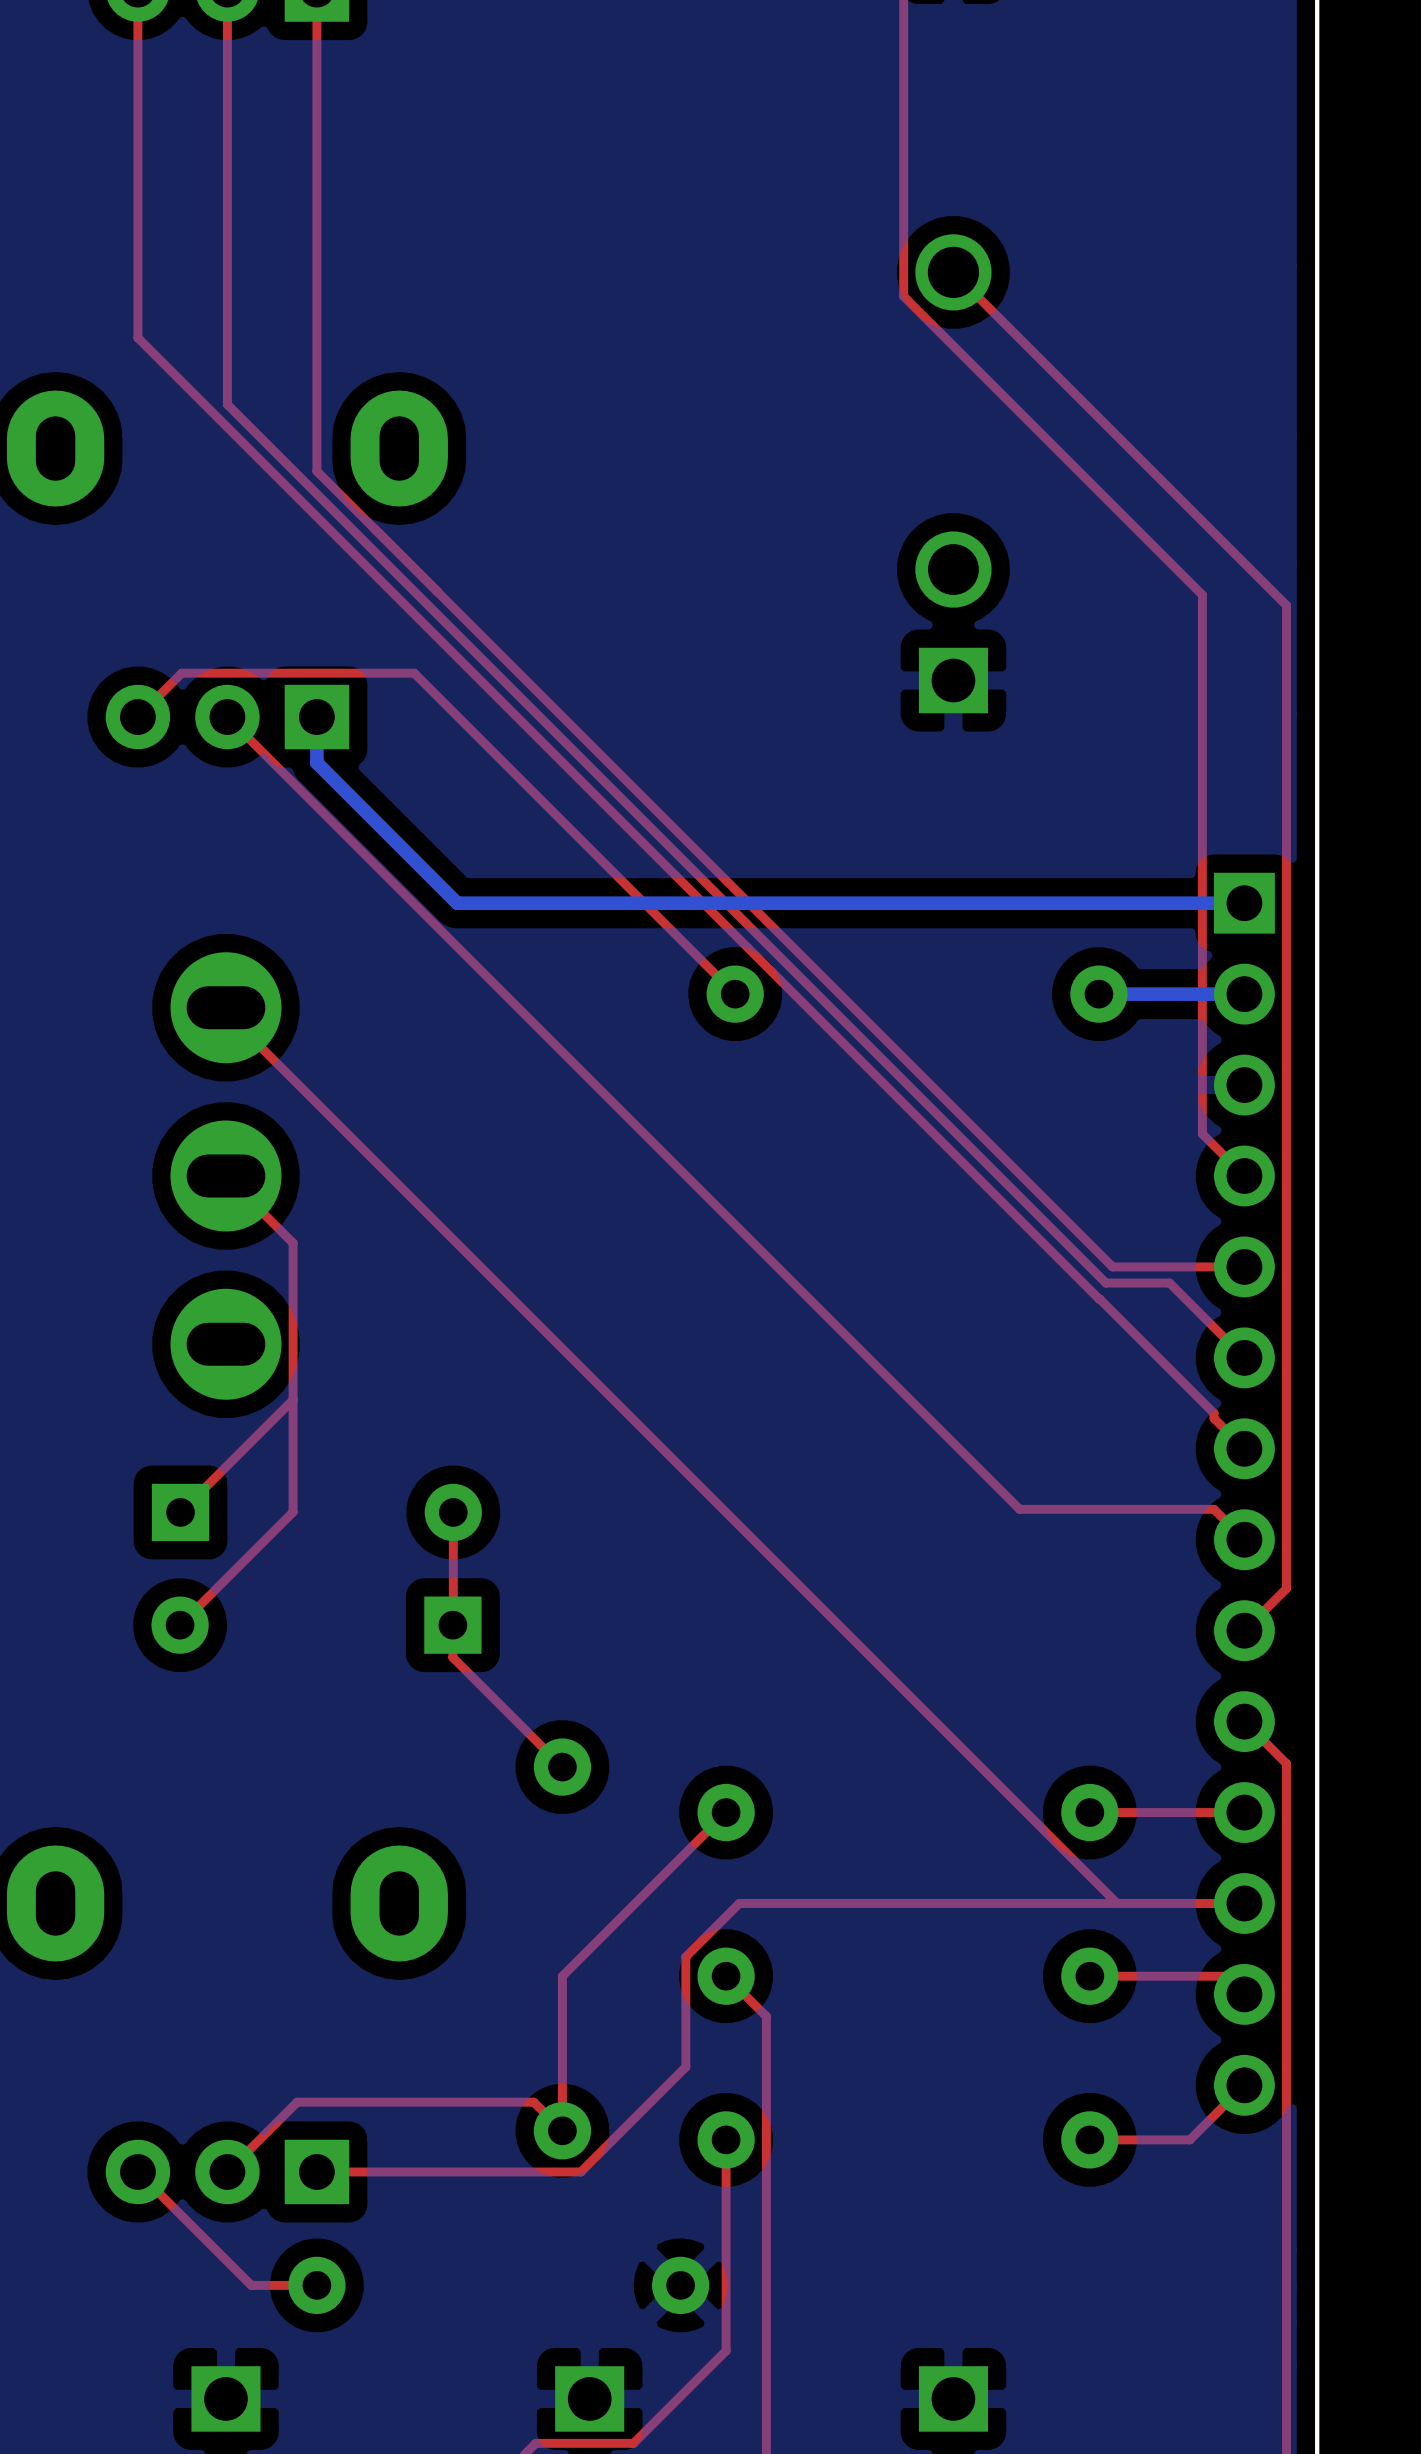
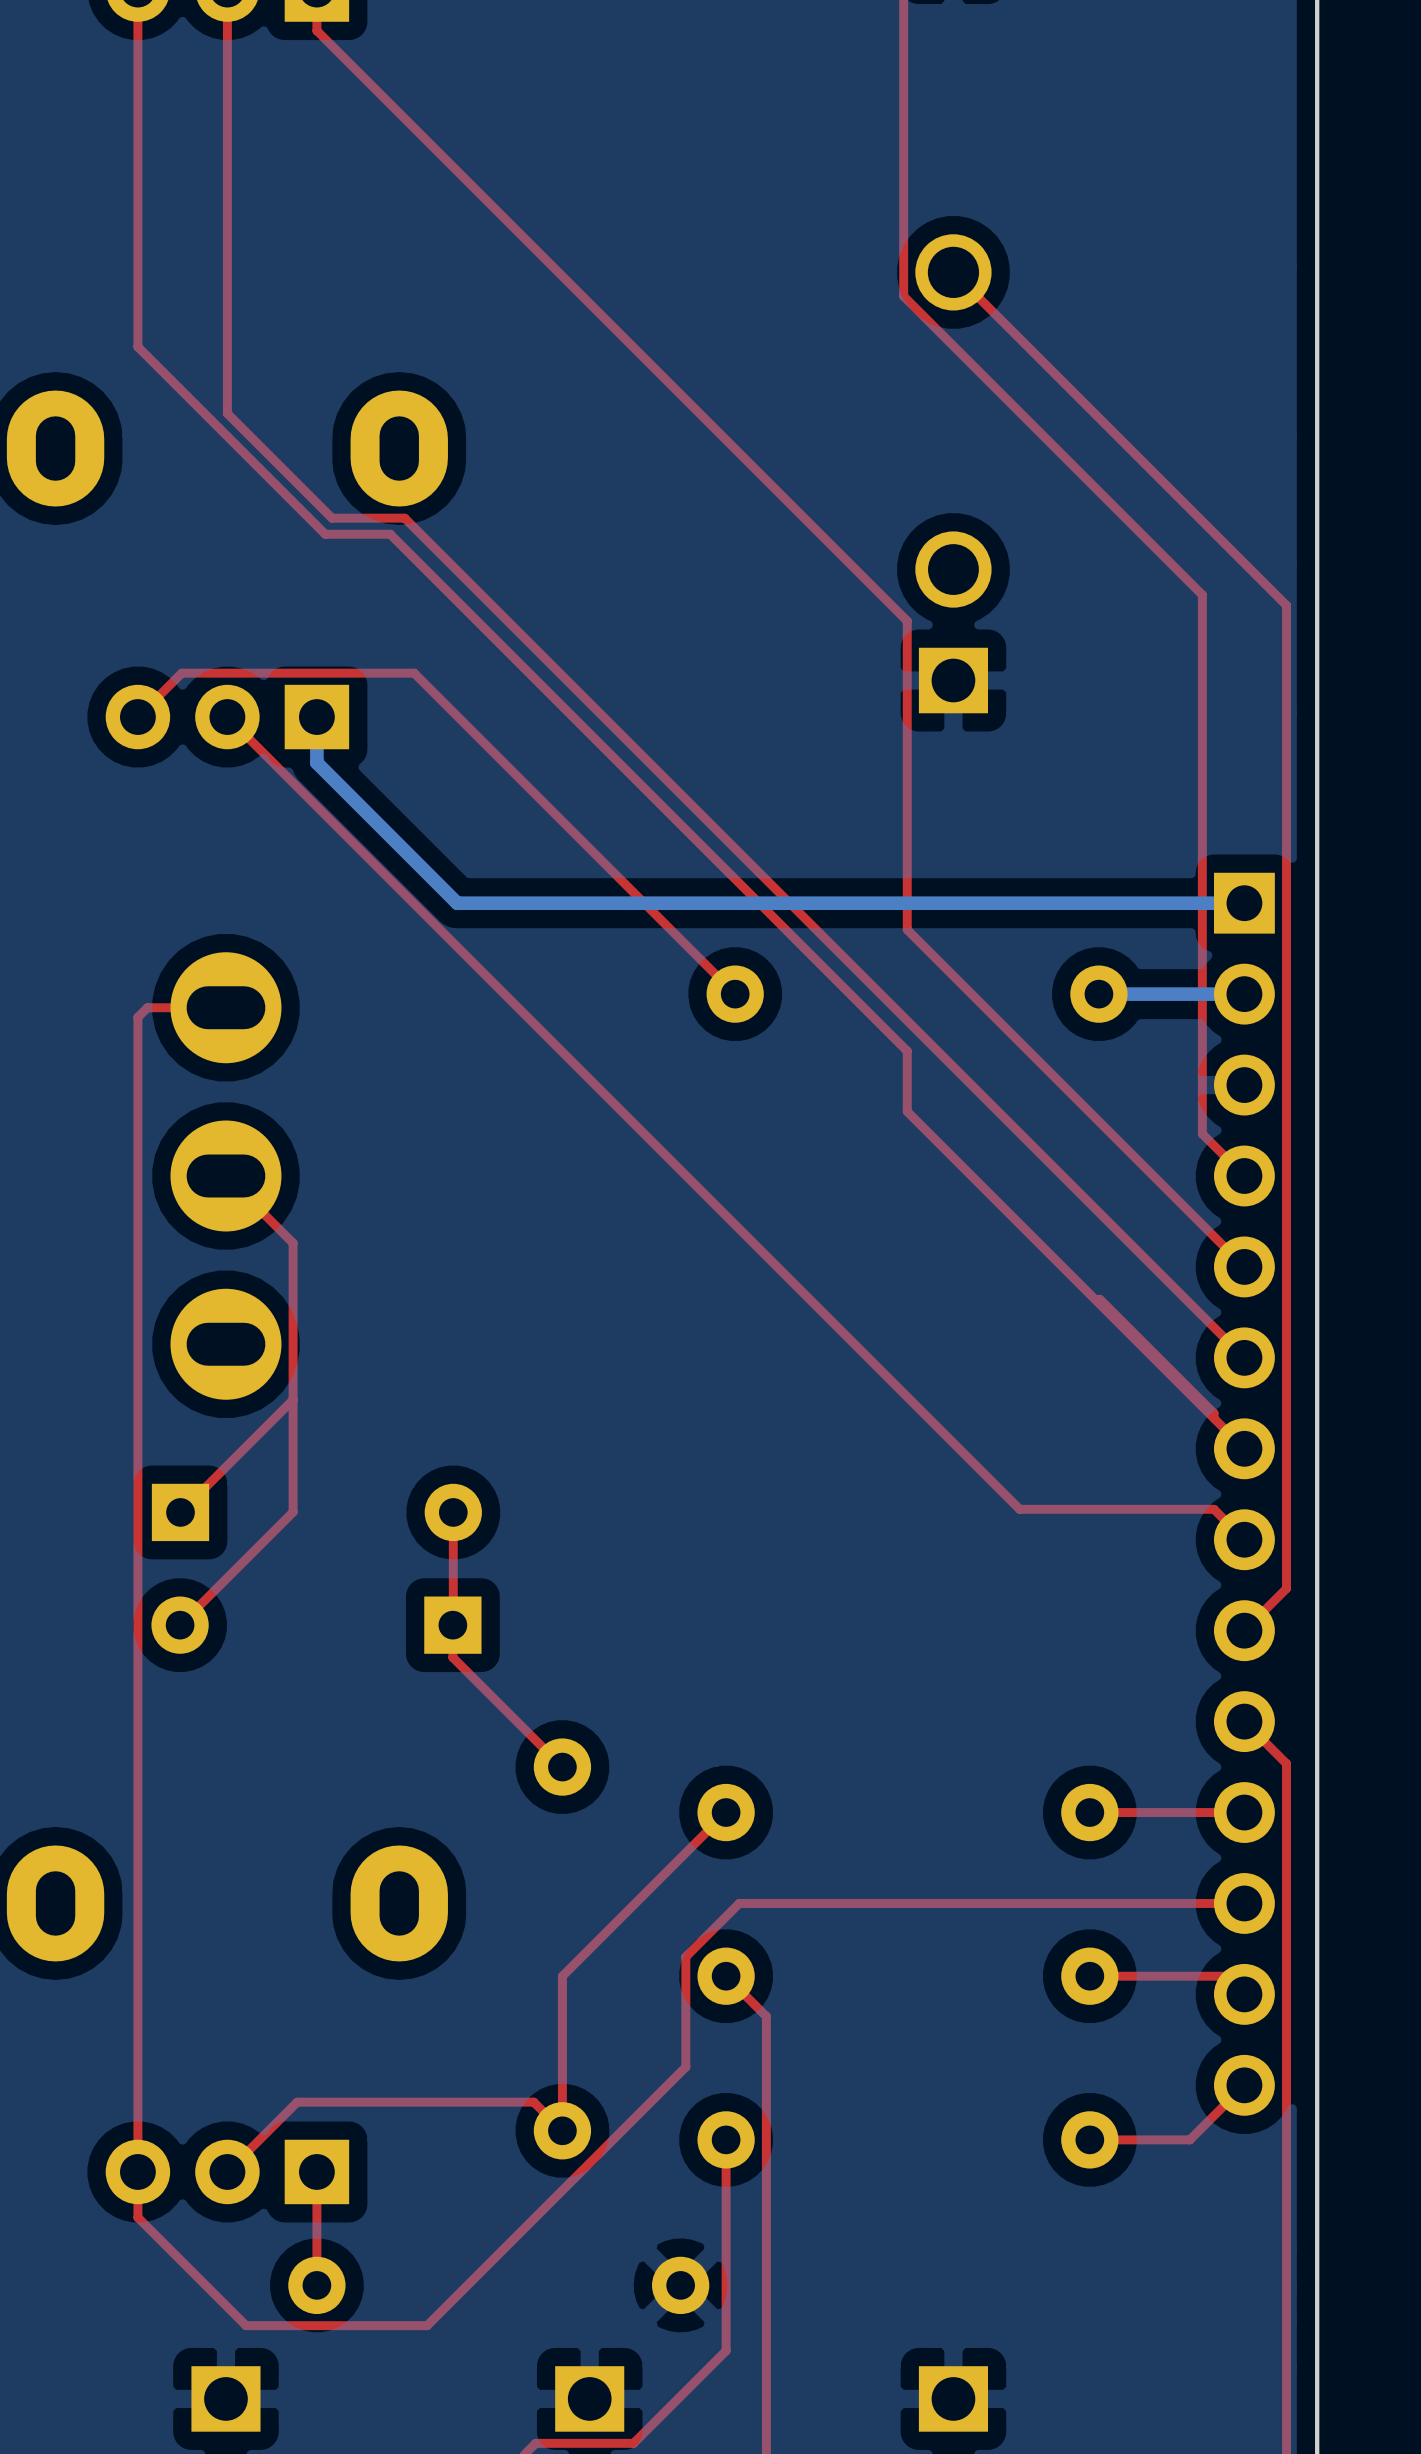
top track: (316, 30) (316, 471) (1112, 1266) (1244, 1266) -> (316, 30) (907, 621) (907, 929) (1244, 1266)
top track: (137, 337) (1099, 1299) -> (137, 337) (137, 346) (325, 534) (390, 534) (907, 1051) (907, 1111) (1214, 1418)
top track: (227, 404) (1105, 1283) (1169, 1283) -> (227, 404) (227, 413) (331, 518) (404, 518) (1169, 1283)
top track: (225, 1007) (225, 1012) (1117, 1903) -> (225, 1007) (147, 1007) (137, 1017) (137, 2217) (246, 2325) (427, 2325) (580, 2171)
top track: (137, 2171) (251, 2285) (316, 2285) -> (316, 2171) (316, 2285)
top track: (580, 2171) (316, 2171) -> none

